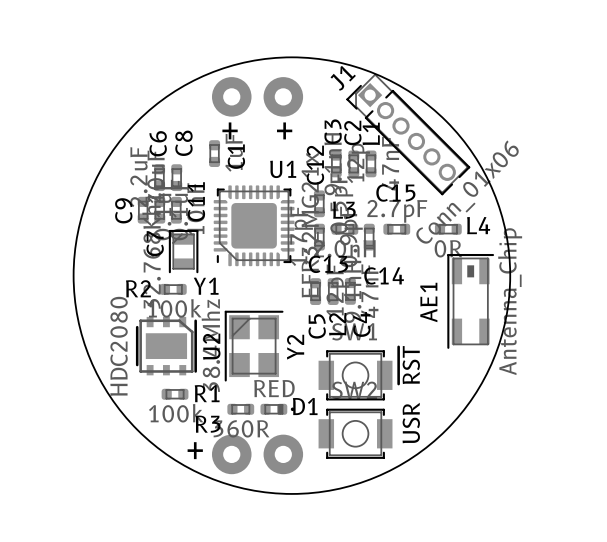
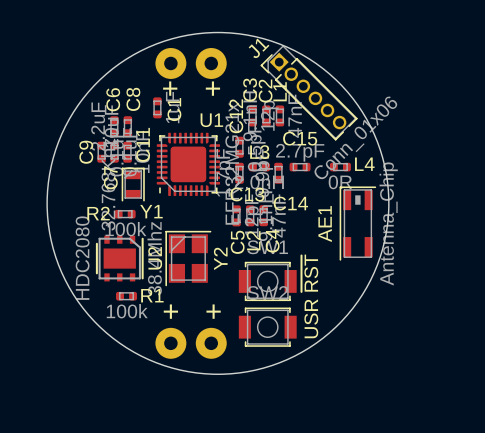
R3: 360R (240, 409) -> none
D1: RED (277, 409) -> none
text: none -> + (213, 311)
text position: + (195, 450) -> + (170, 311)

